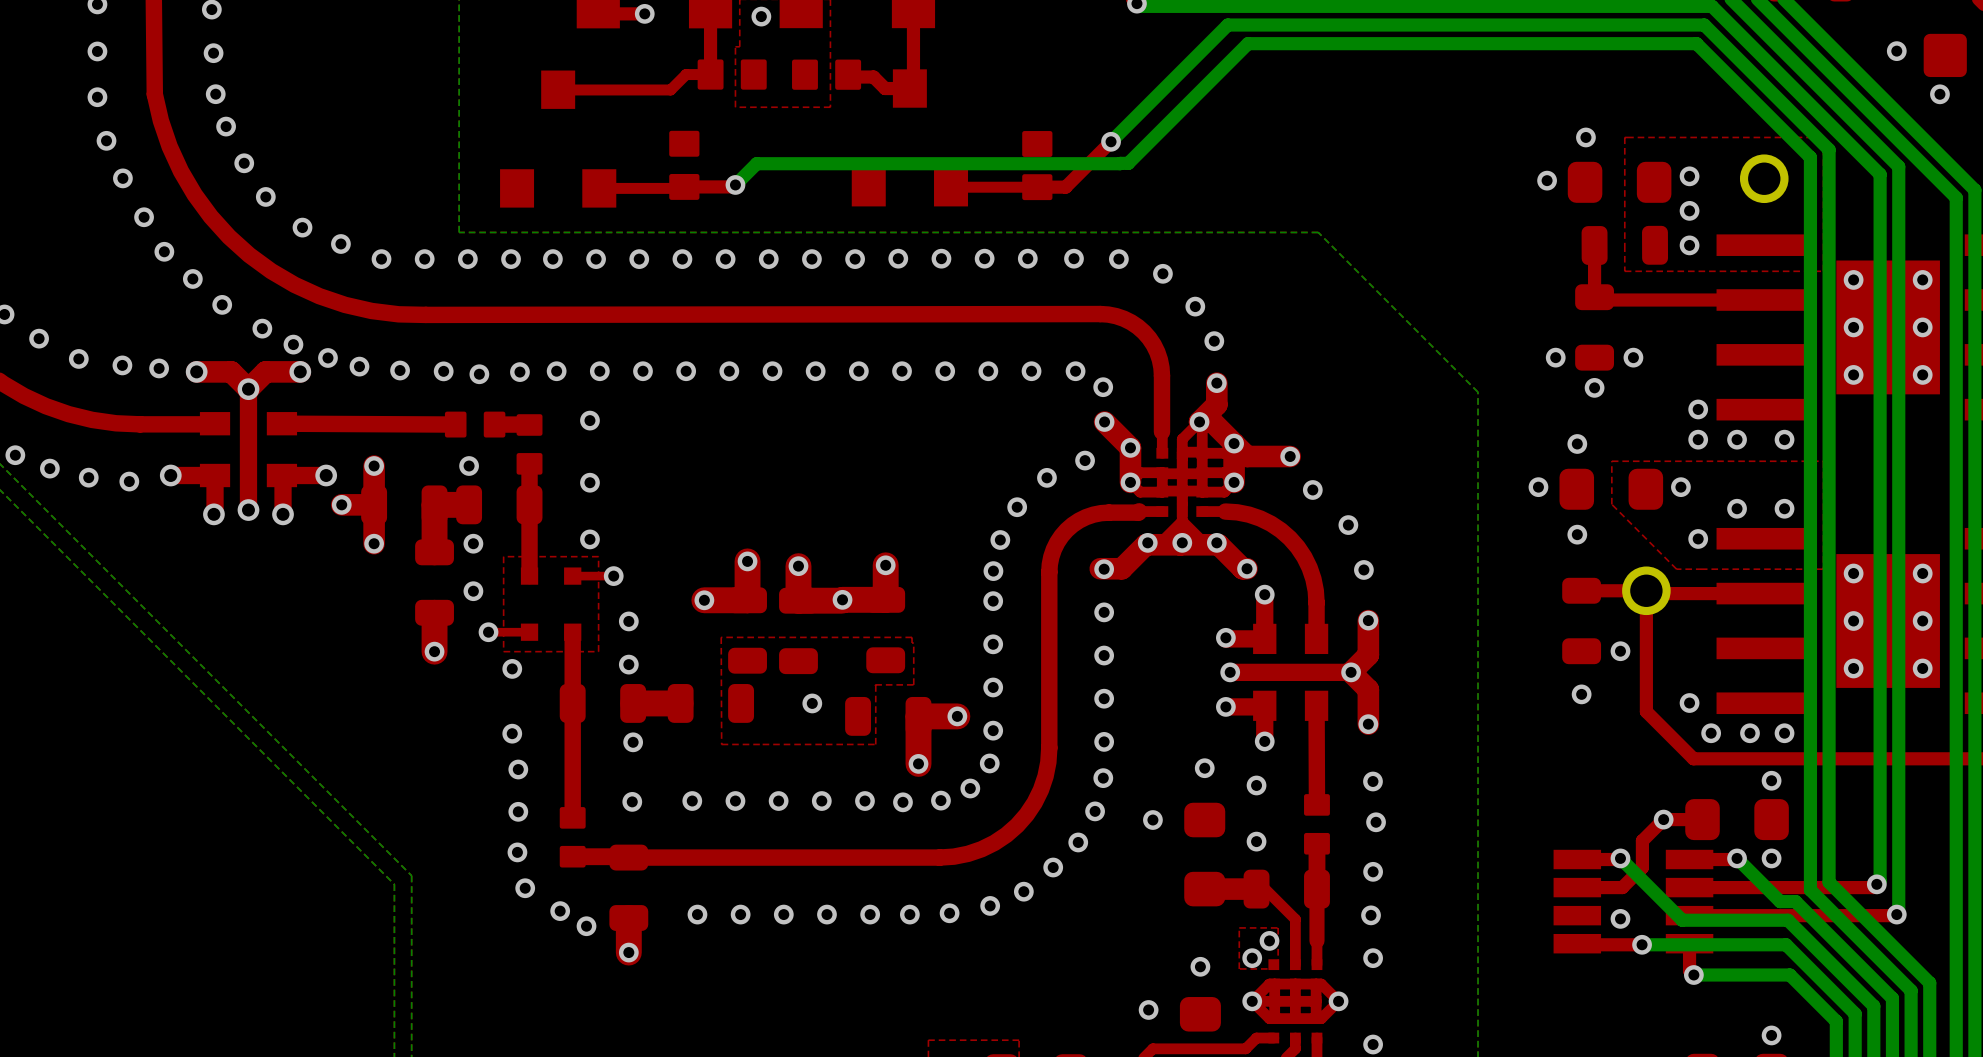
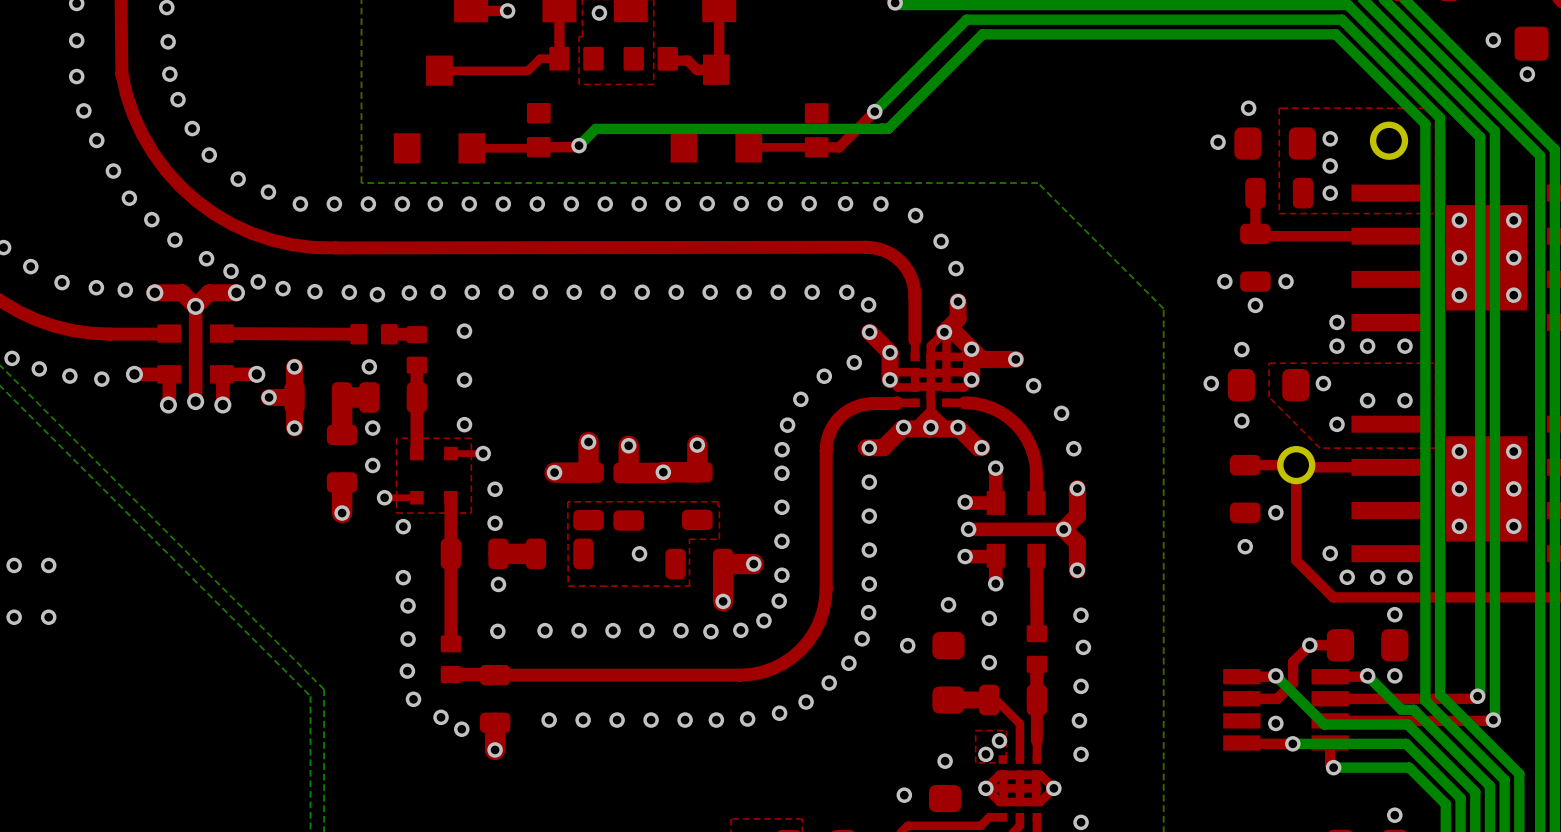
via: none -> (14, 565)
via: none -> (48, 565)
via: none -> (14, 617)
via: none -> (48, 617)

